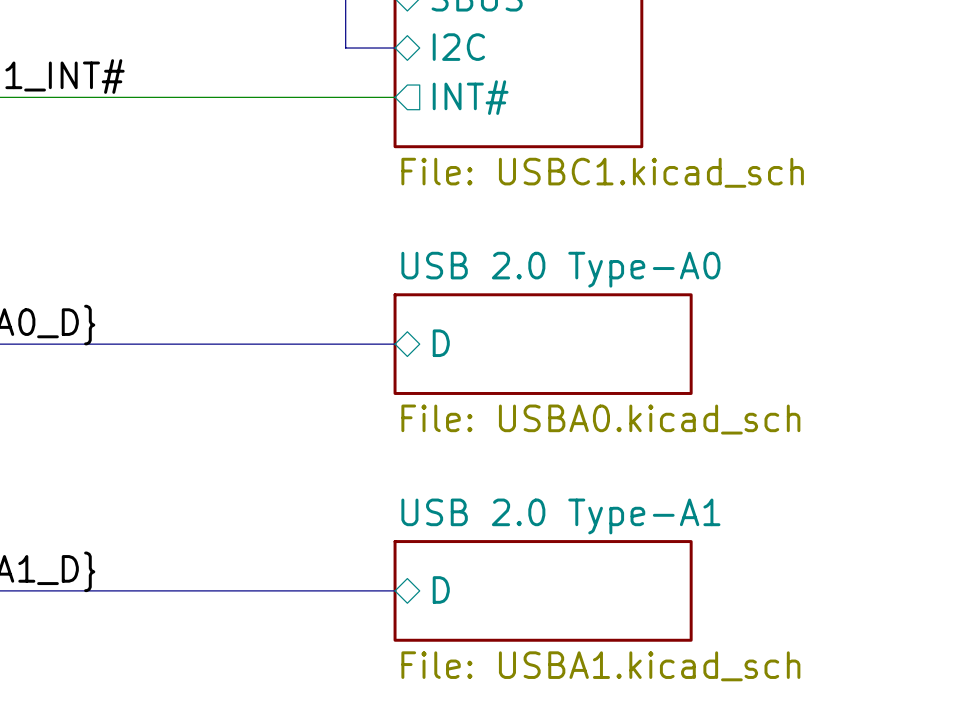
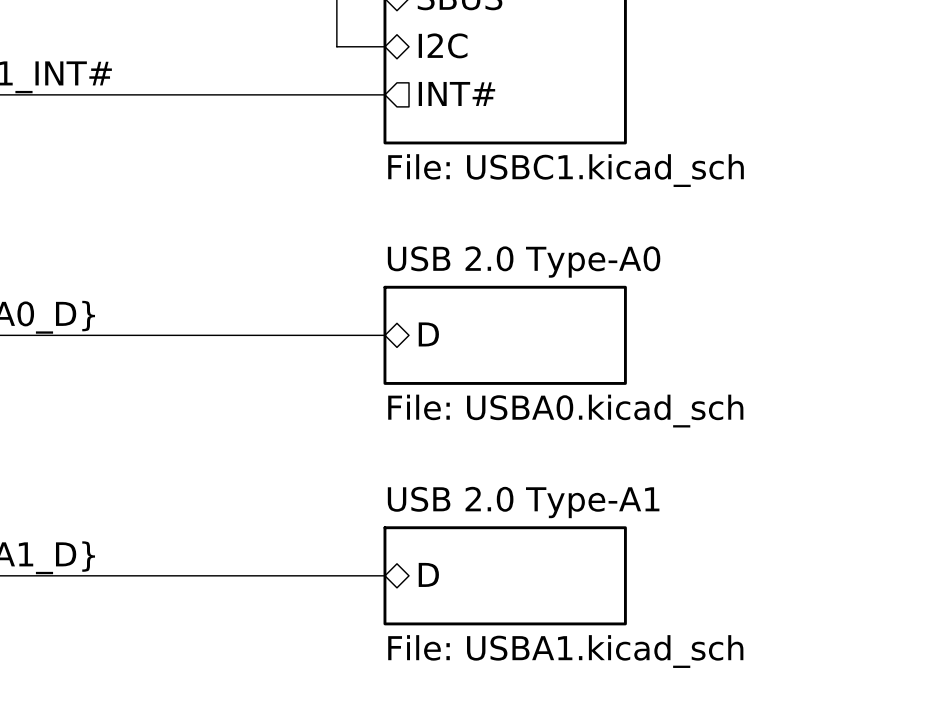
sheet USB 2.0 Type-A0 shape: [393, 293, 693, 395] -> [383, 285, 627, 385]
sheet USB 2.0 Type-A1 shape: [393, 540, 693, 642] -> [383, 526, 627, 626]

